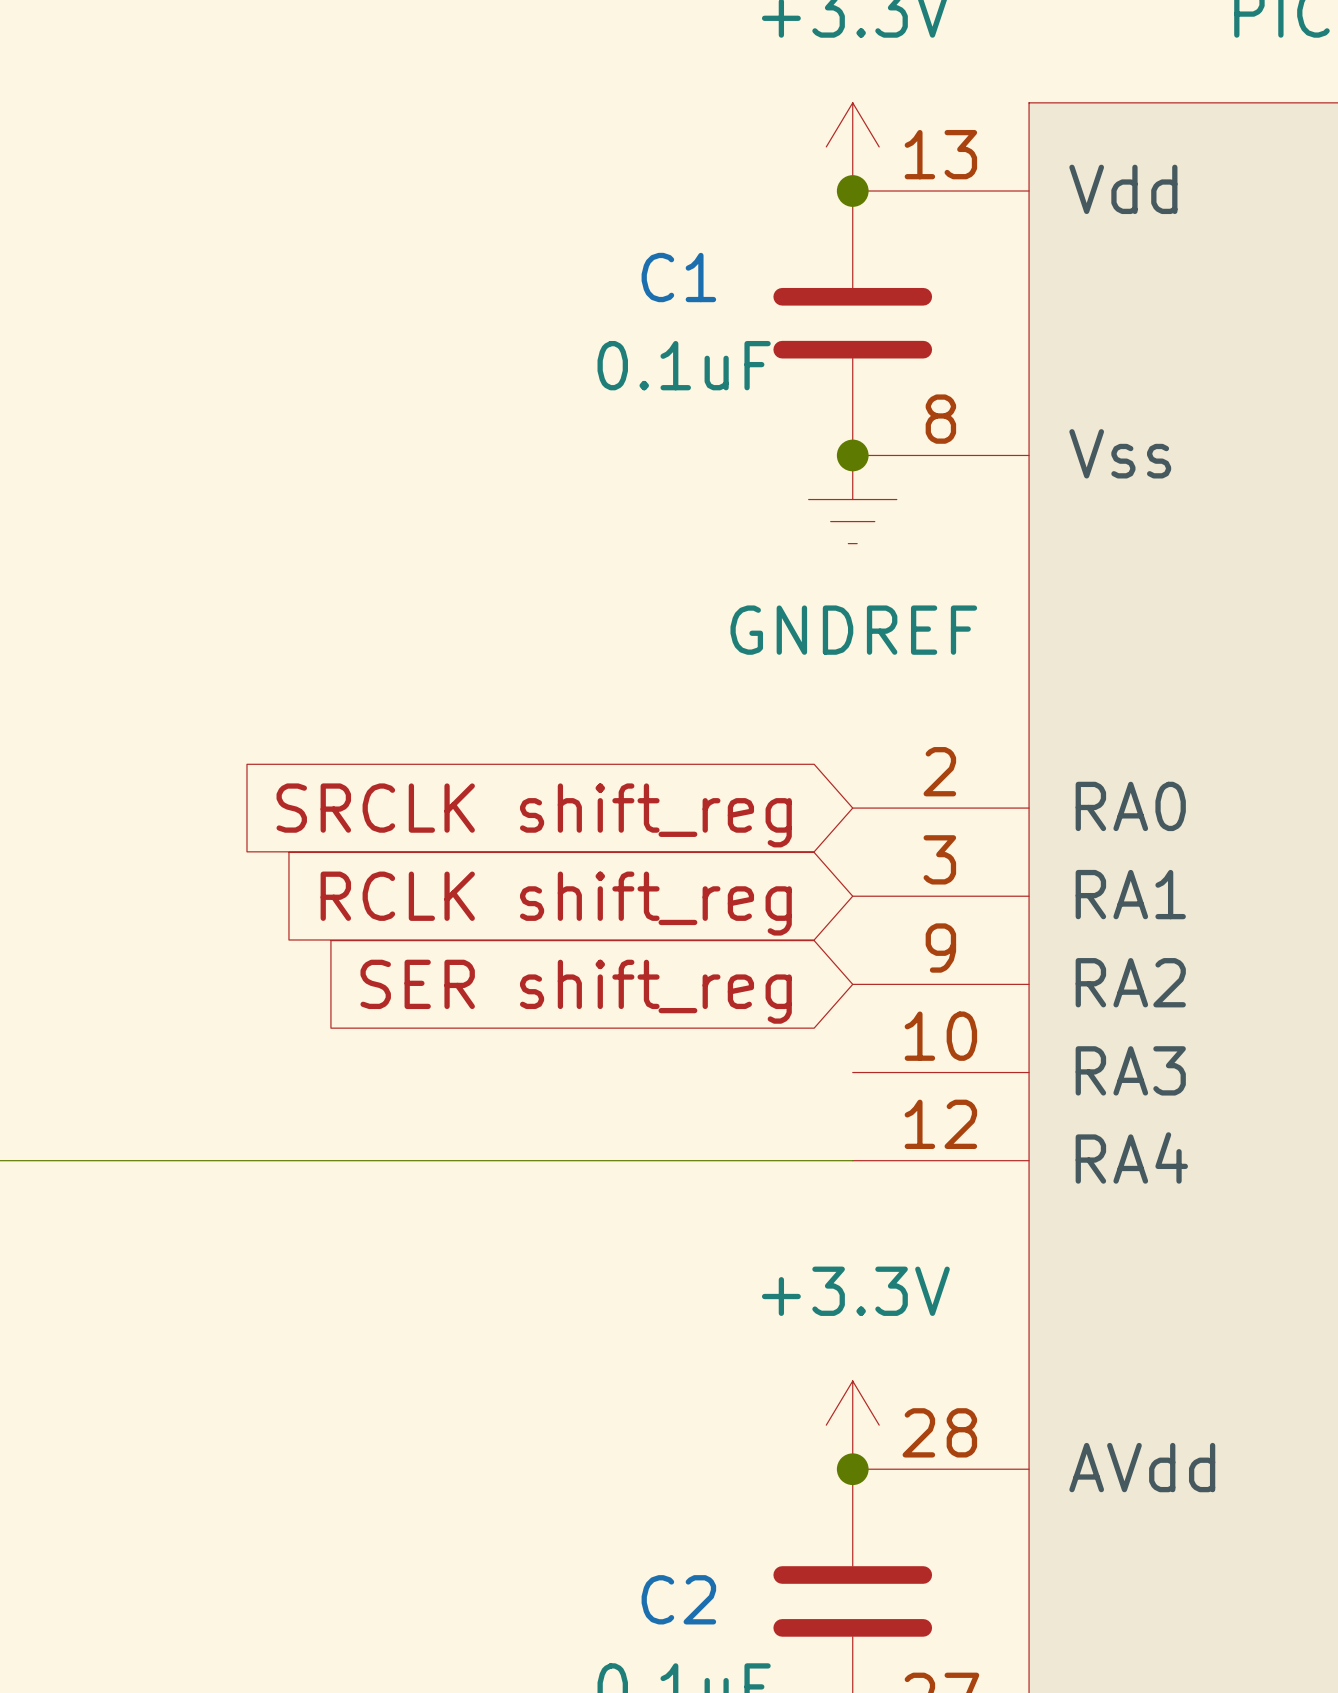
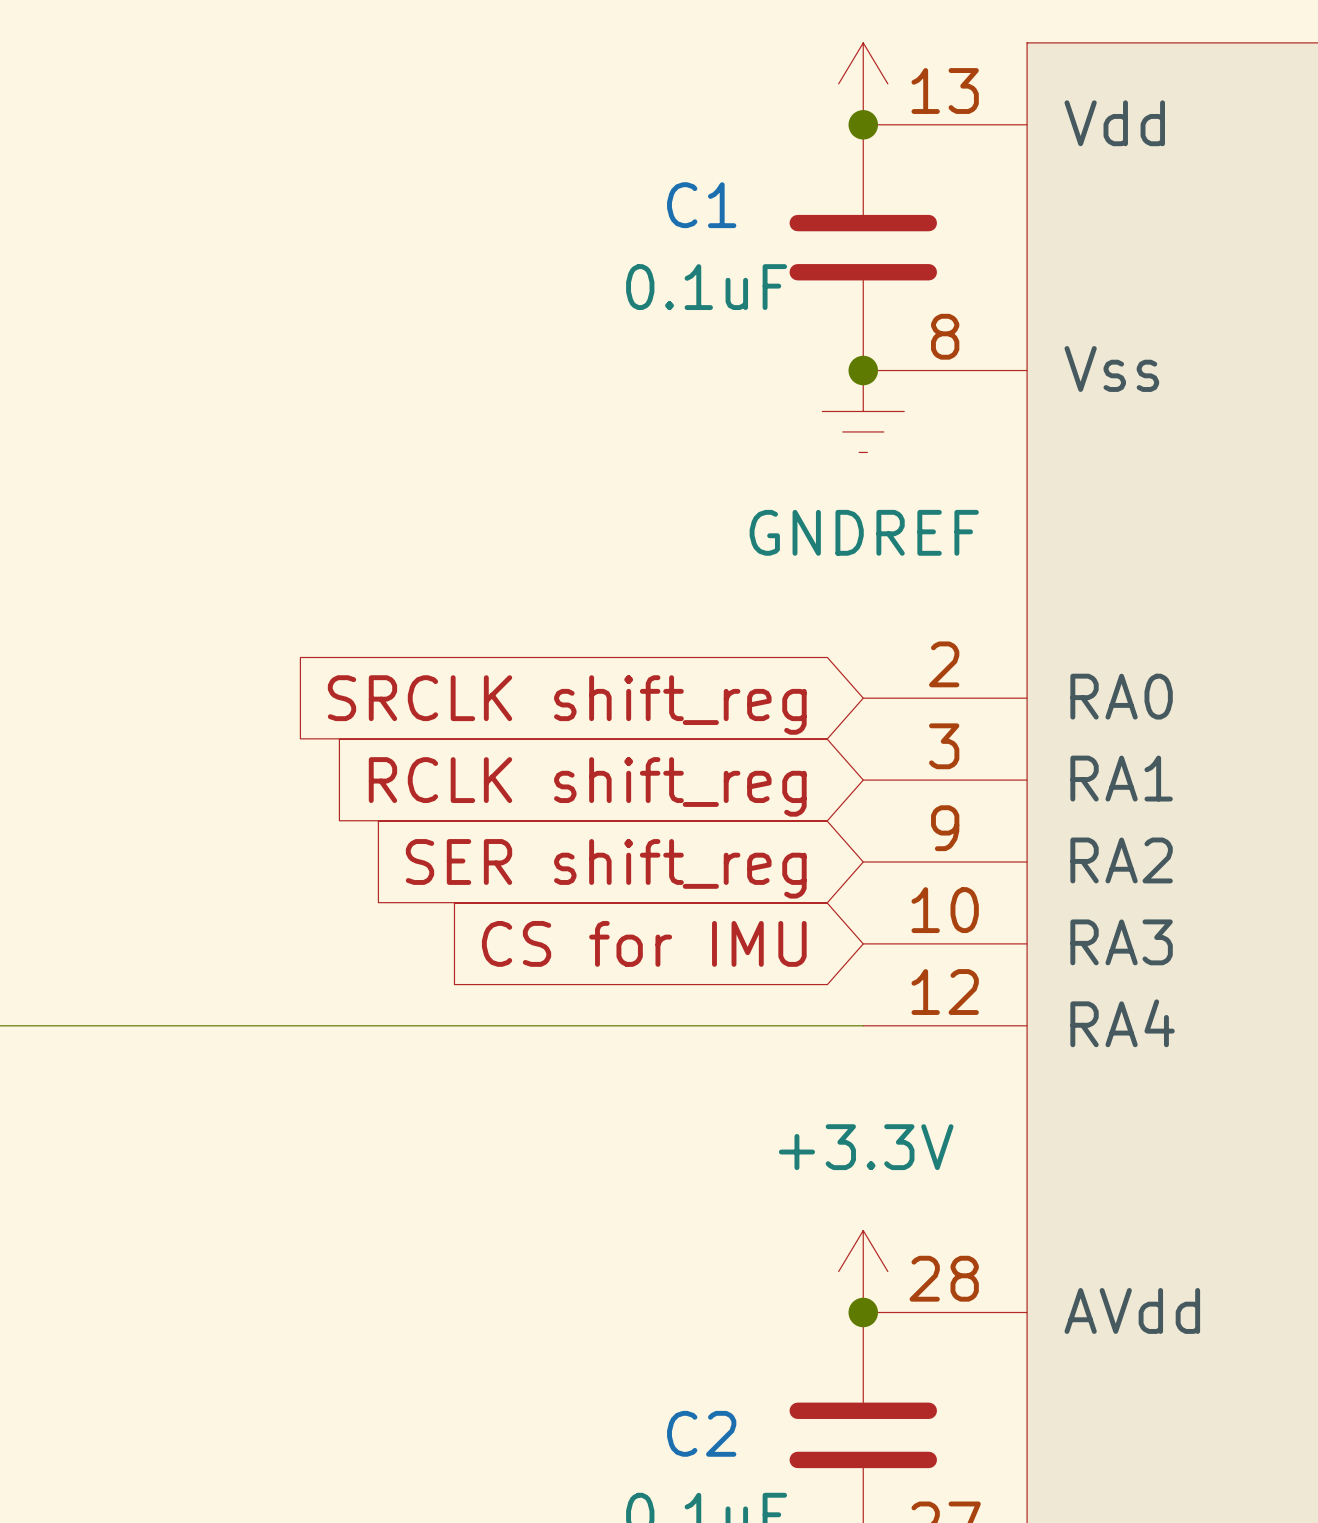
global label: none -> CS for IMU (644, 943)

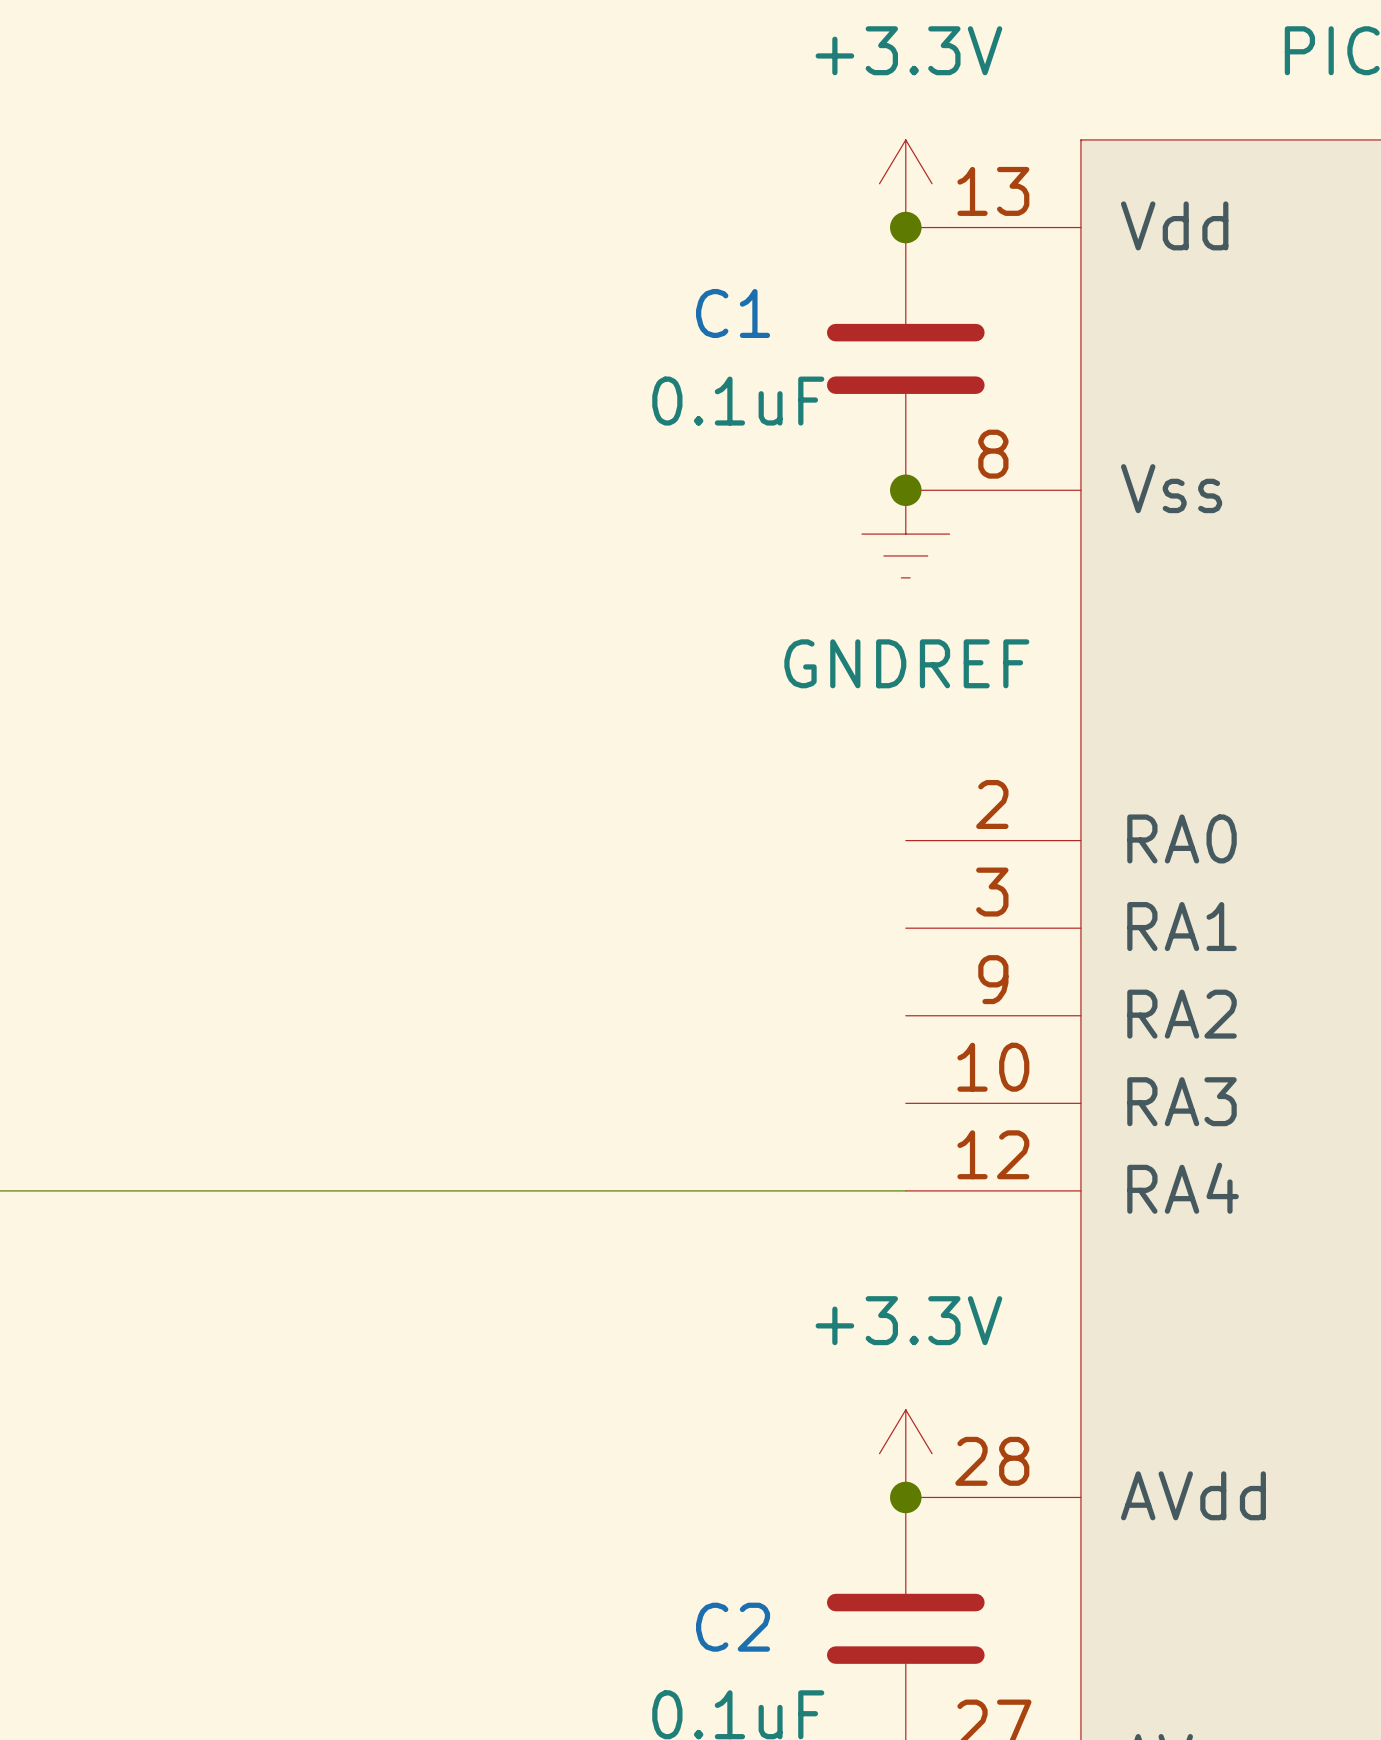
global label: SRCLK shift_reg (567, 704) -> none
global label: RCLK shift_reg (587, 786) -> none
global label: SER shift_reg (606, 868) -> none
global label: CS for IMU (644, 943) -> none

